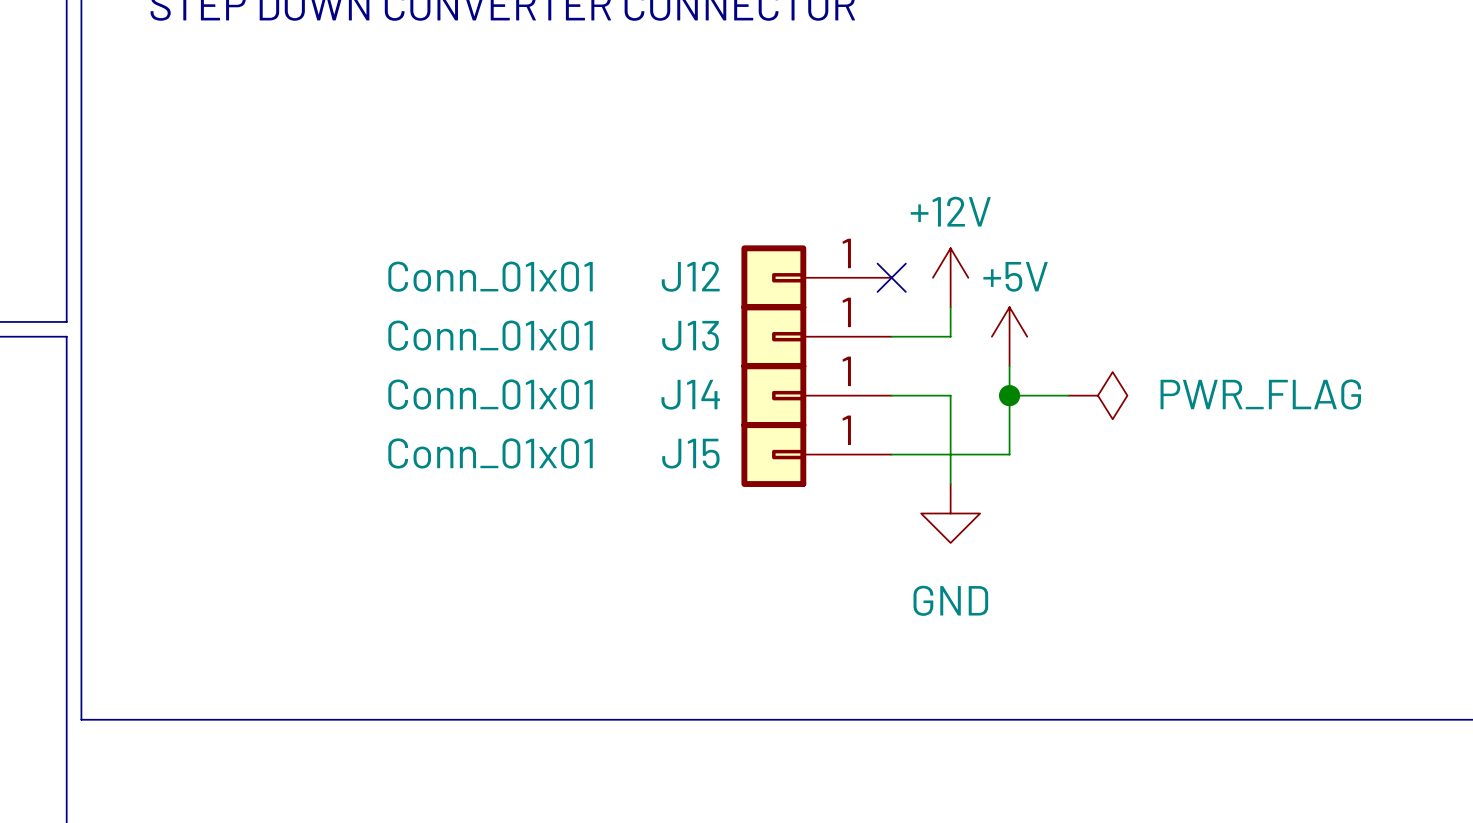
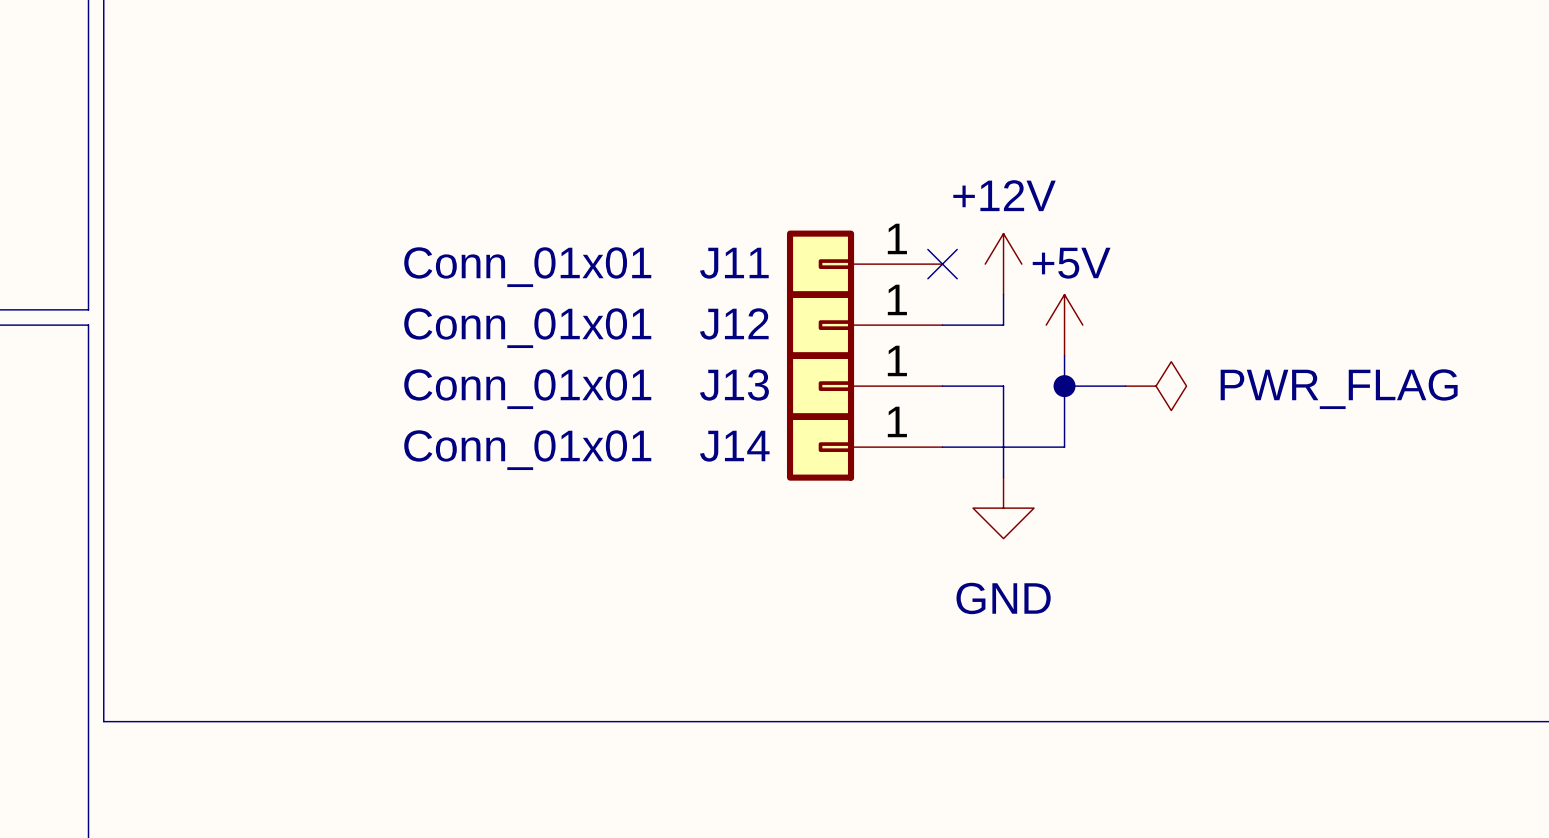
J12 name: J12 (690, 276) -> J11 (734, 263)
J13 name: J13 (690, 335) -> J12 (734, 323)
J14 name: J14 (690, 394) -> J13 (734, 384)
J15 name: J15 (690, 453) -> J14 (734, 446)

